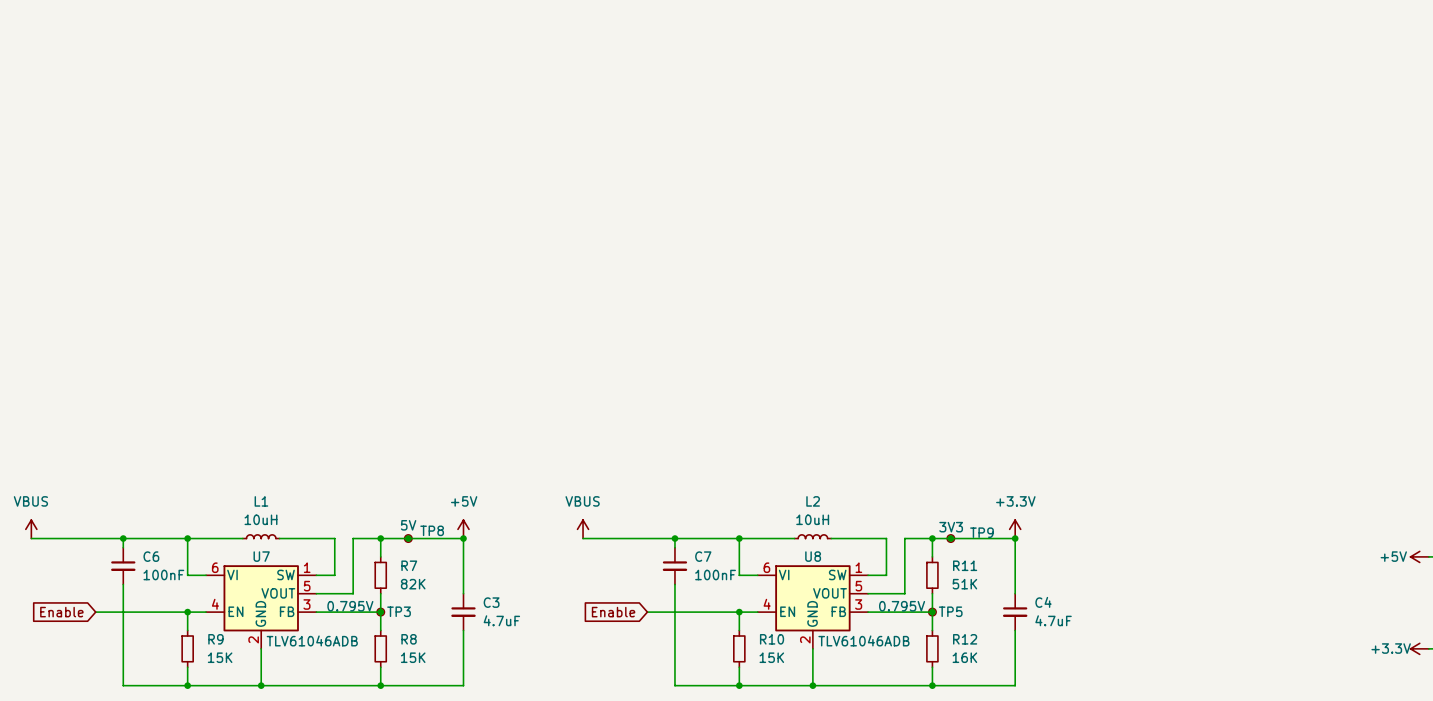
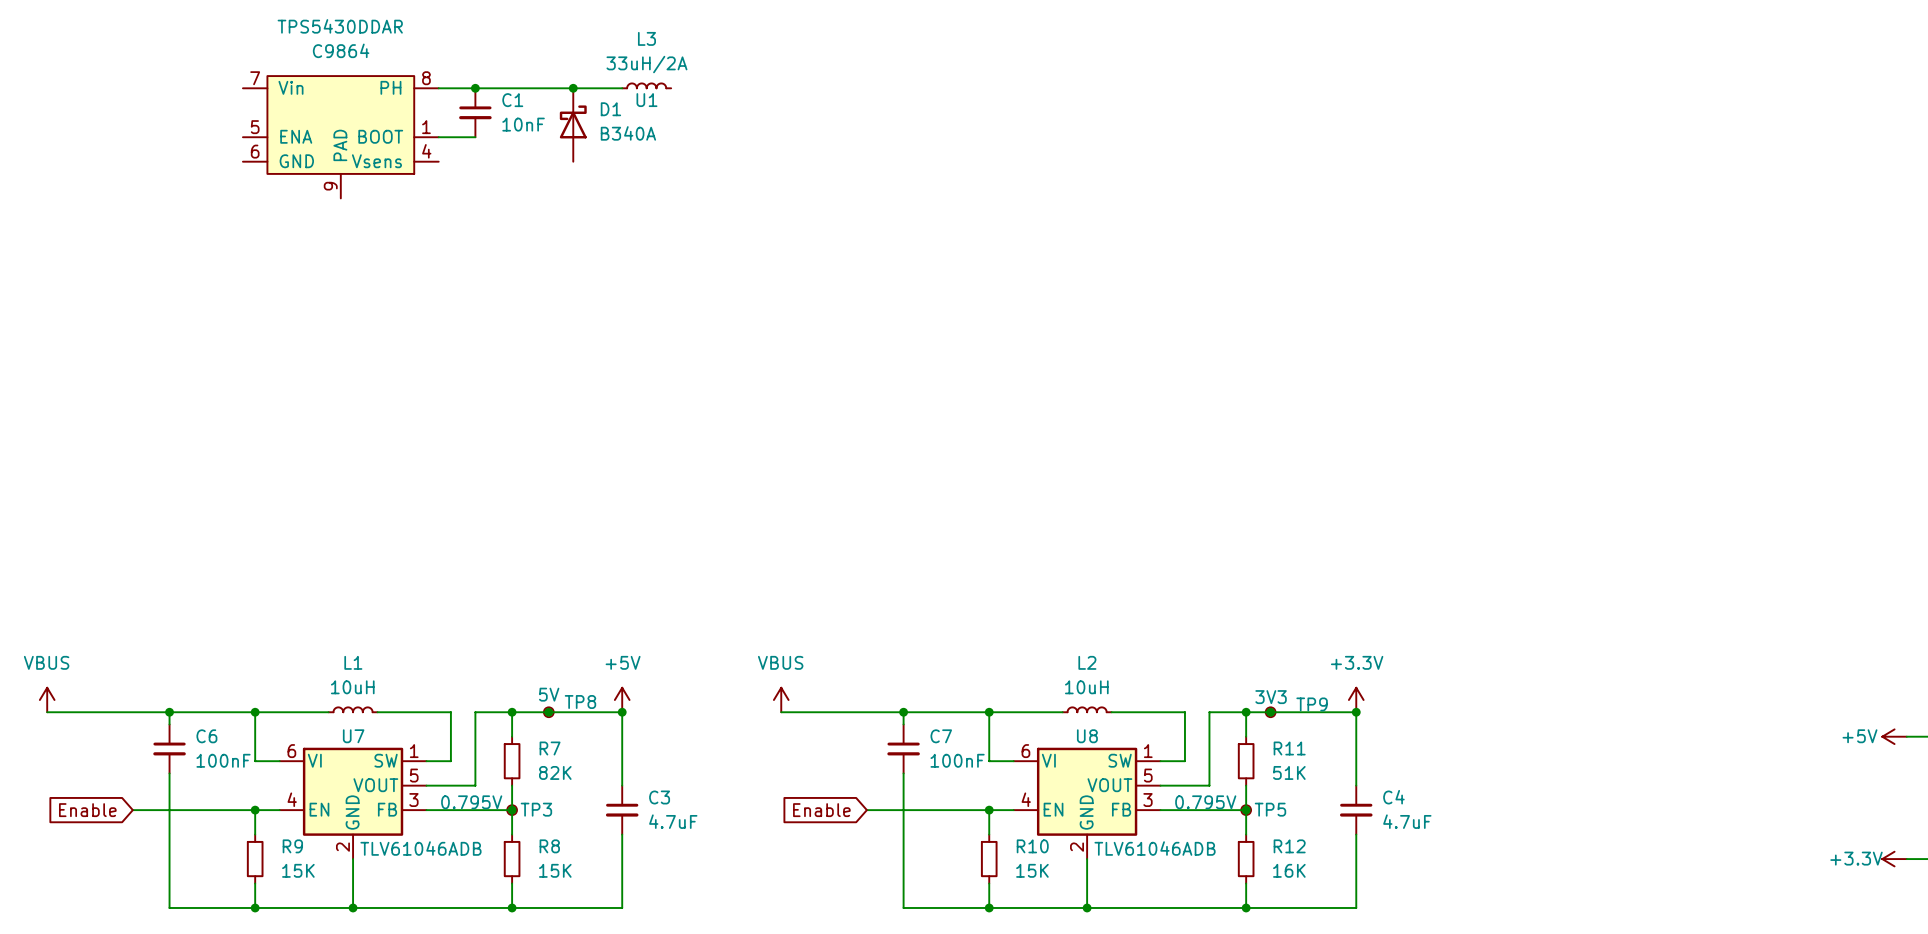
L3: none -> 33uH/2A (646, 85)
wire: none -> (438, 88) (622, 88)
junction: none -> (475, 88)
junction: none -> (573, 88)
C1: none -> 10nF (475, 112)
D1: none -> B340A (573, 125)
U1: none -> TPS5430DDAR (340, 137)
wire: none -> (438, 137) (475, 137)

